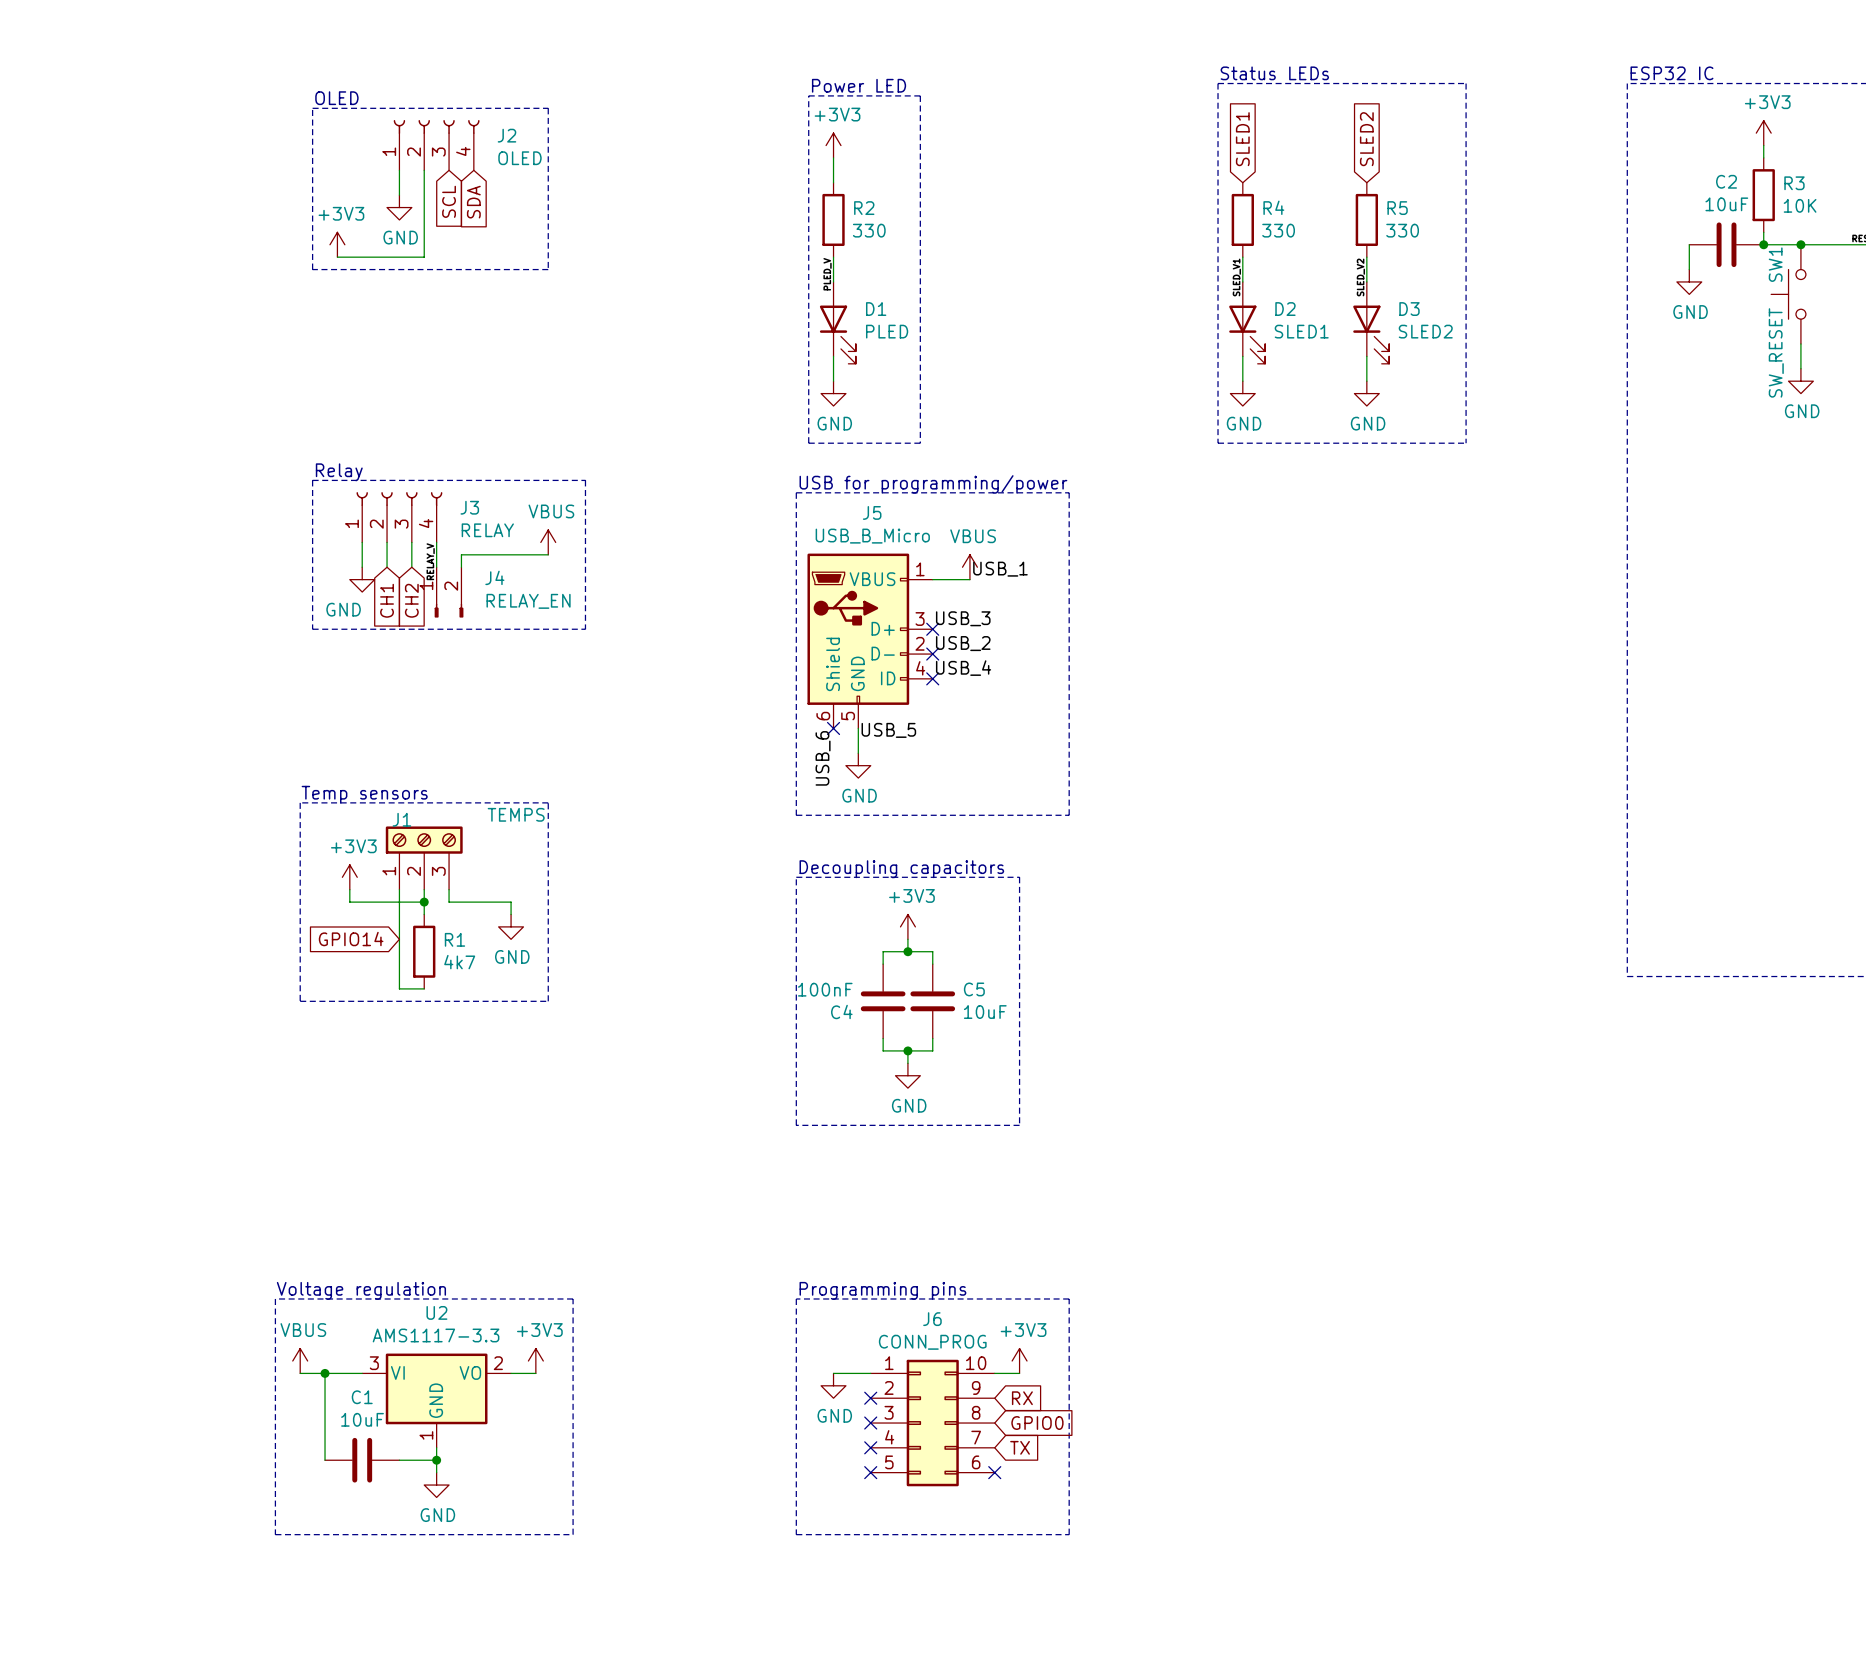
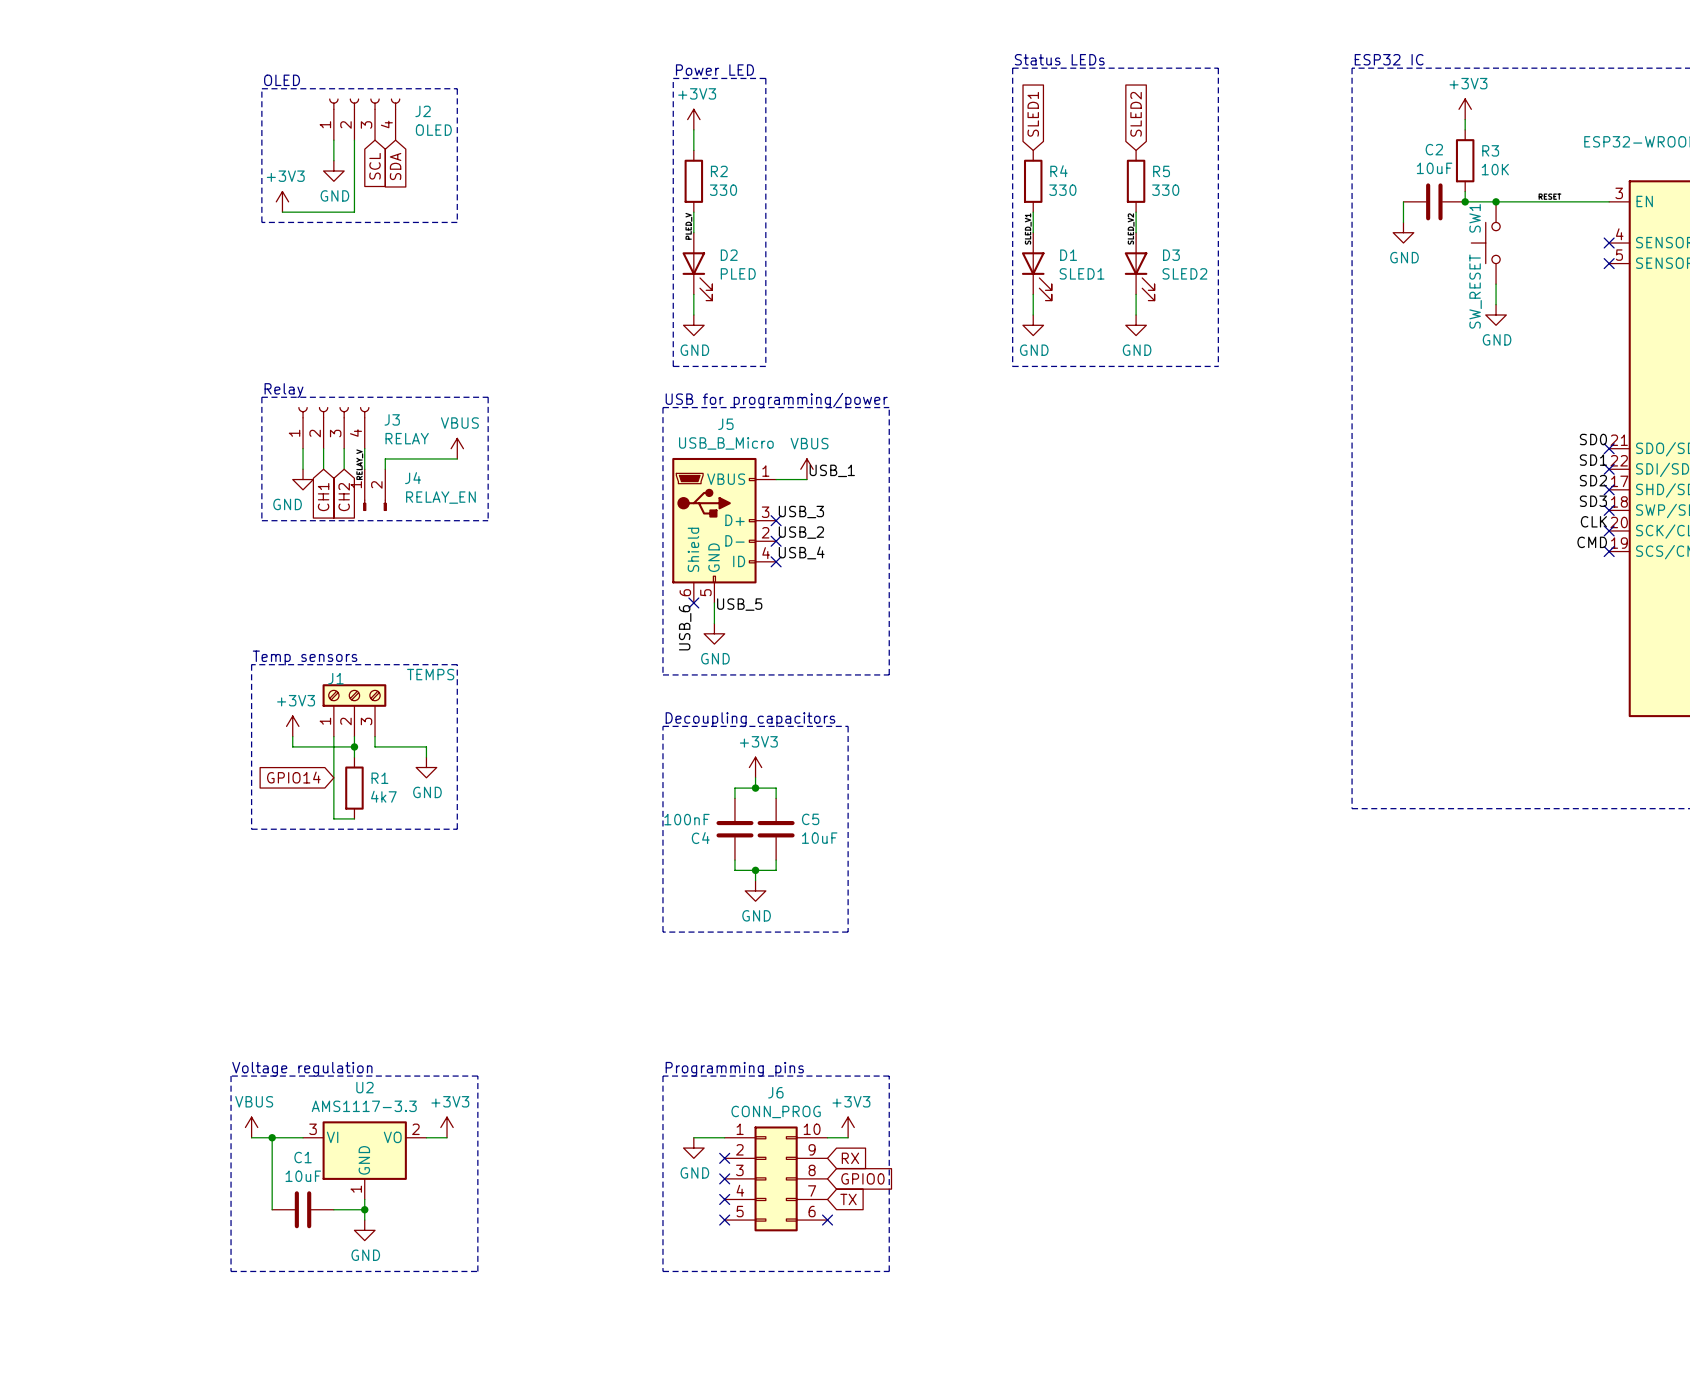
D1 name: D1 (876, 309) -> D2 (729, 255)
D2 name: D2 (1285, 309) -> D1 (1068, 255)

